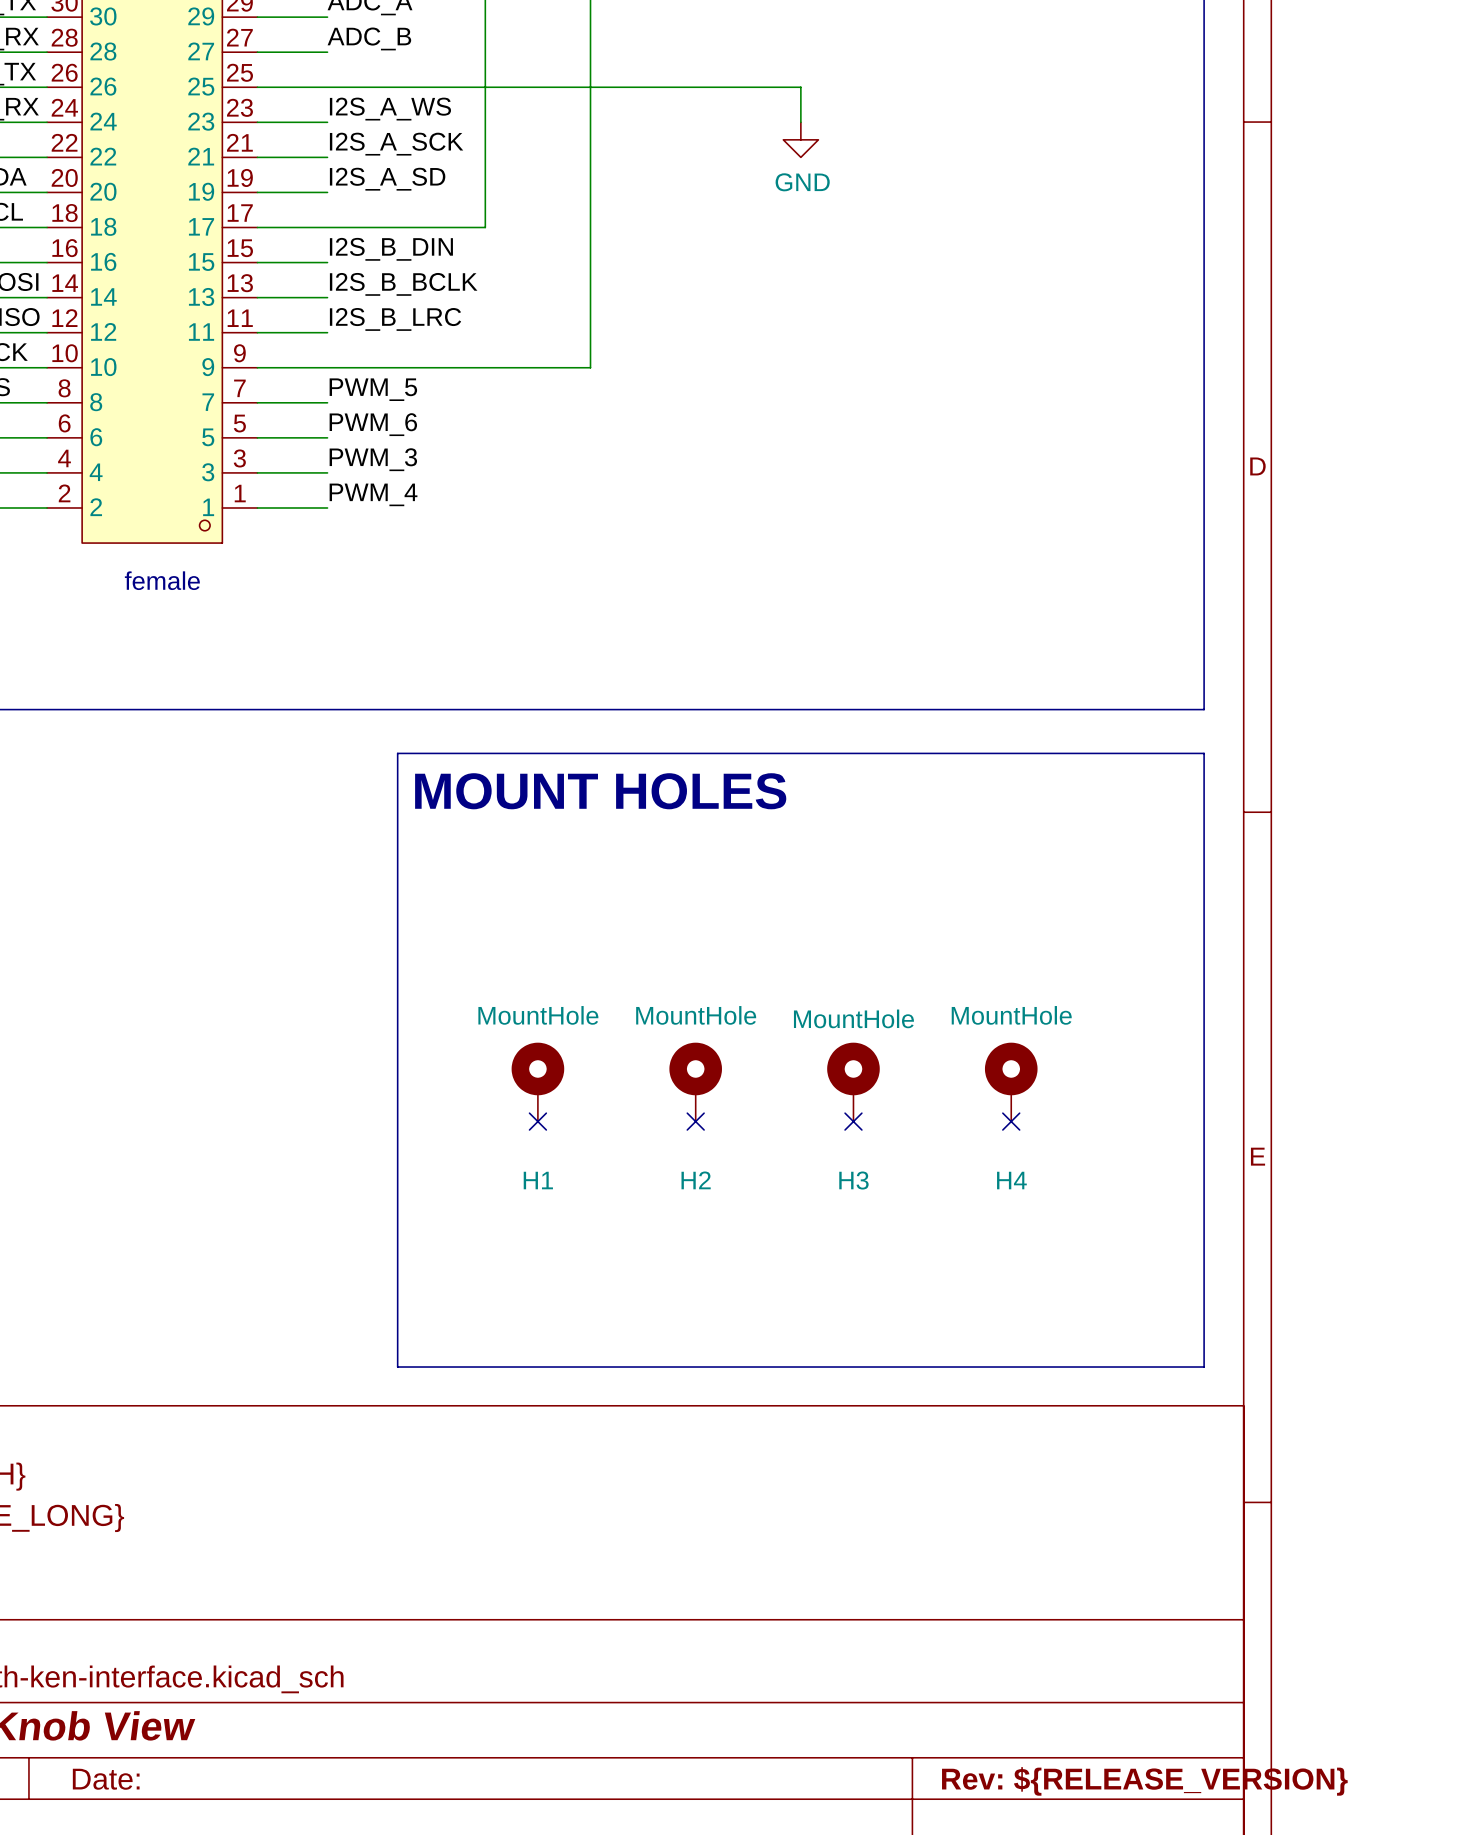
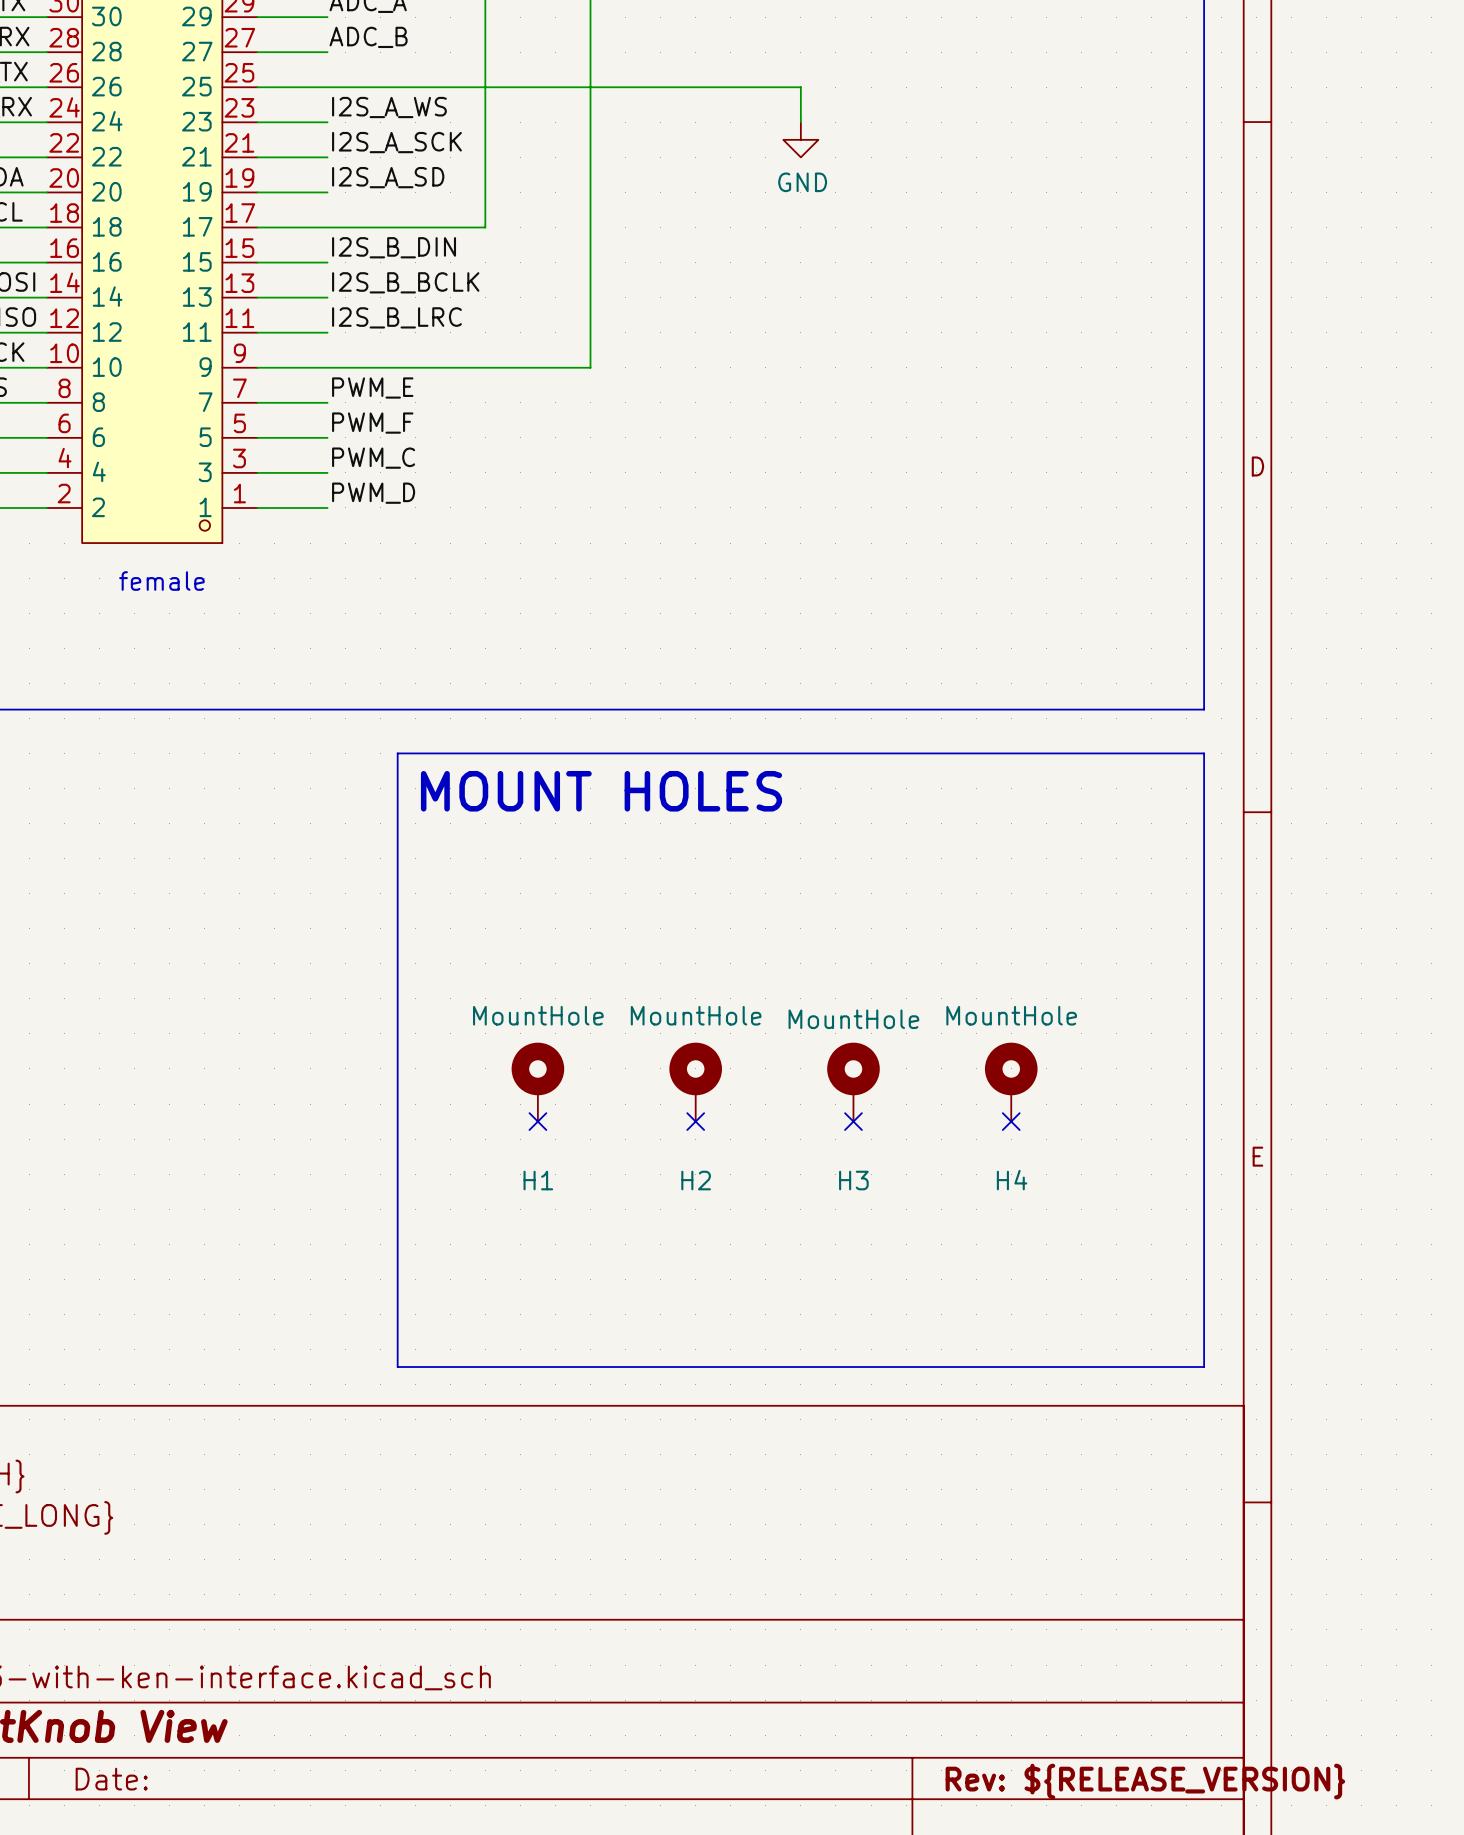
label: PWM_5 (373, 389) -> PWM_E (372, 388)
label: PWM_6 (373, 424) -> PWM_F (372, 423)
label: PWM_3 (373, 459) -> PWM_C (373, 458)
label: PWM_4 (373, 494) -> PWM_D (373, 493)

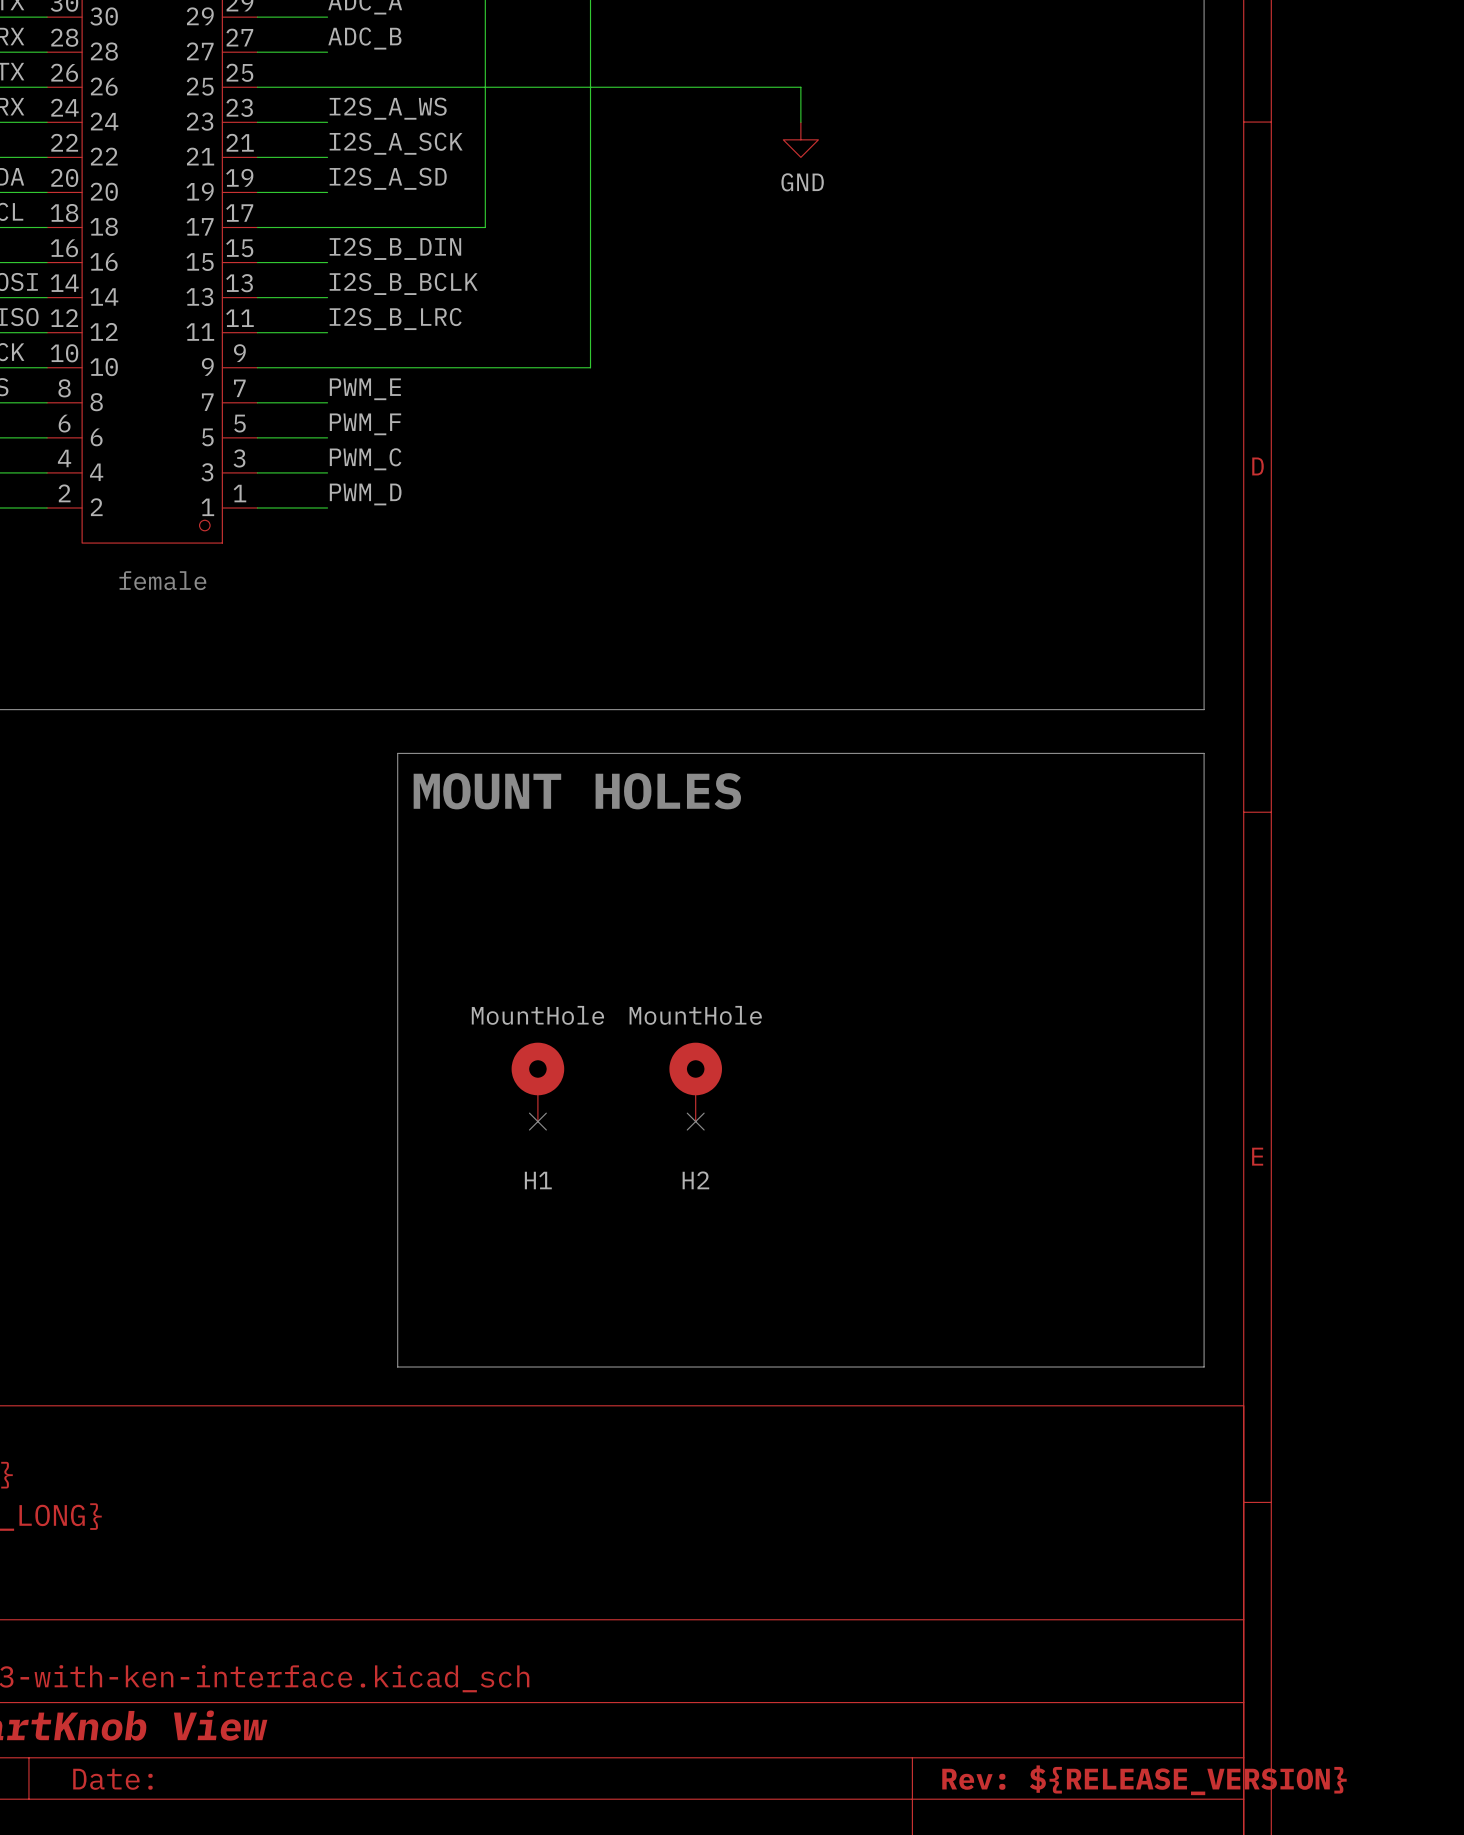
H3: MountHole (853, 1082) -> none
H4: MountHole (1011, 1082) -> none
no-connect mark: (853, 1121) -> none
no-connect mark: (1011, 1121) -> none

